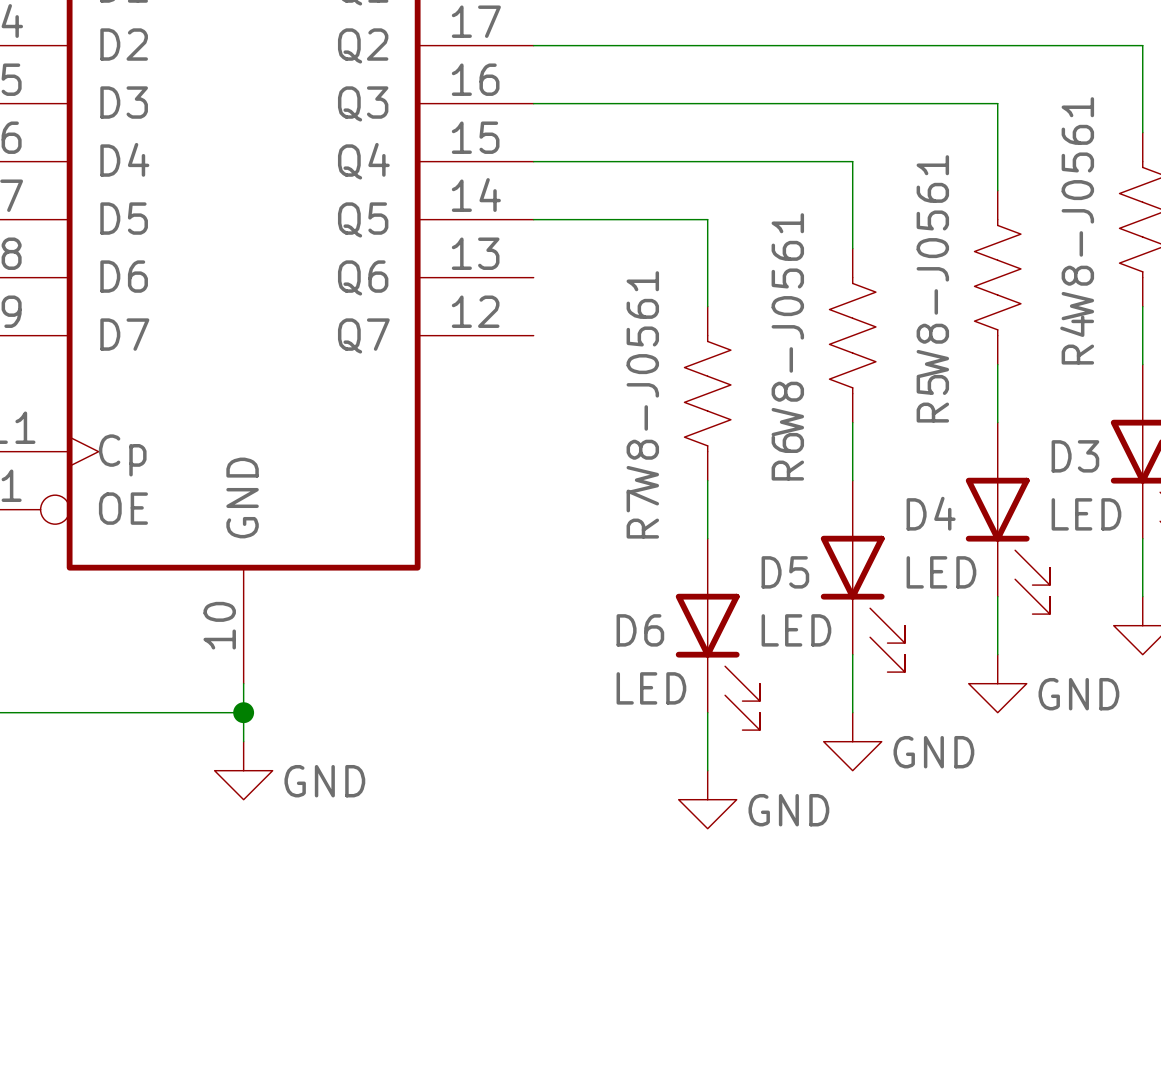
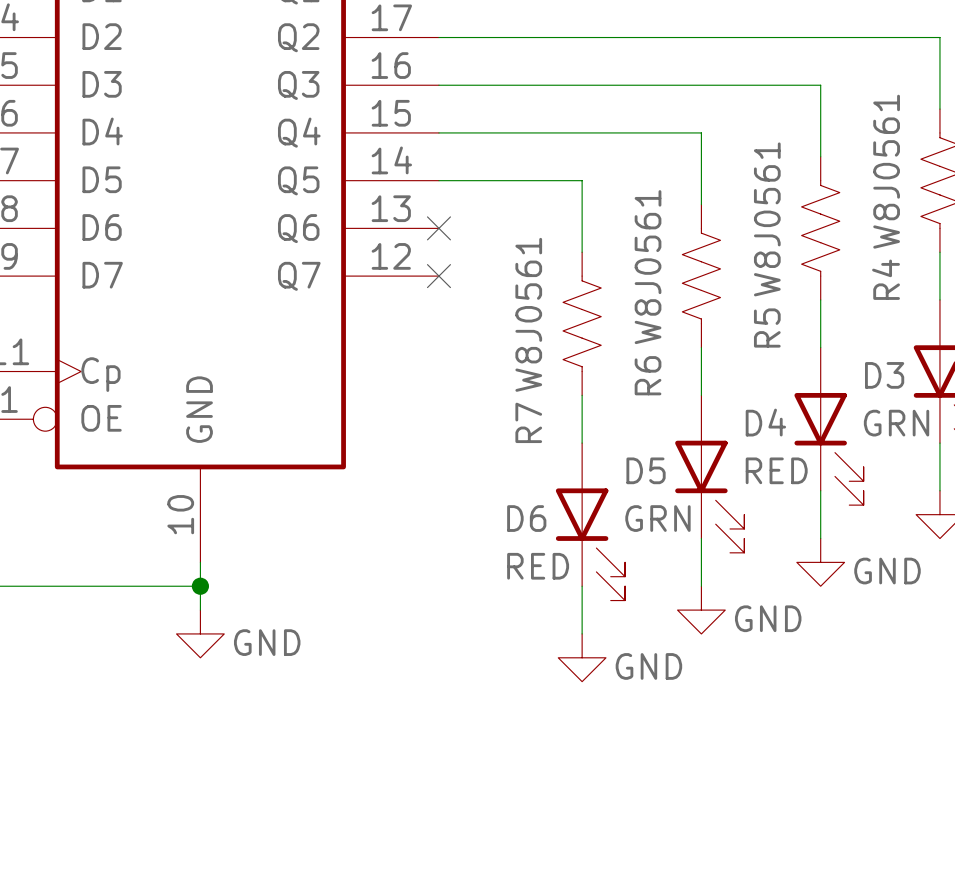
R4 value: W8-J0561 (1077, 208) -> W8J0561 (886, 171)
R5 value: W8-J0561 (932, 266) -> W8J0561 (767, 219)
no-connect mark: none -> (438, 228)
R6 value: W8-J0561 (787, 324) -> W8J0561 (648, 267)
no-connect mark: none -> (438, 276)
R7 value: W8-J0561 (642, 382) -> W8J0561 (528, 314)
D3 value: LED (1086, 514) -> GRN (896, 423)
D4 value: LED (941, 572) -> RED (776, 470)
D5 value: LED (796, 630) -> GRN (657, 518)
D6 value: LED (651, 688) -> RED (538, 566)

